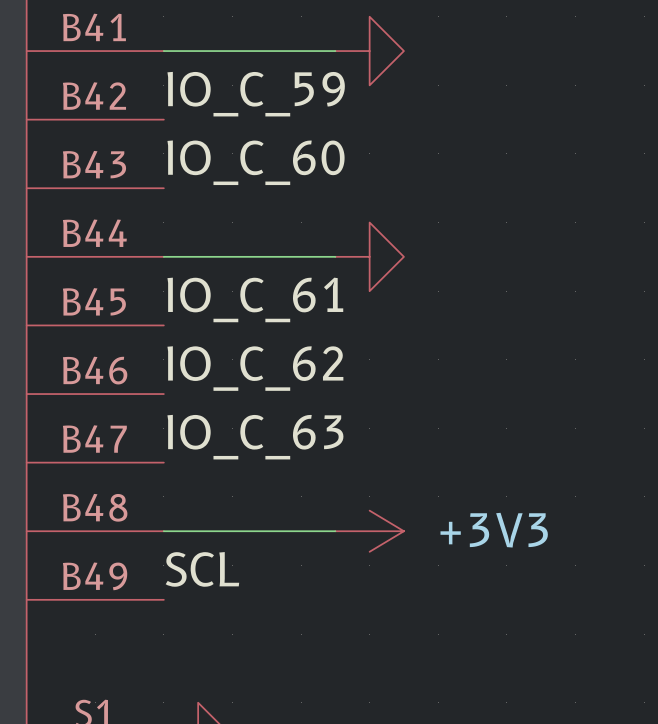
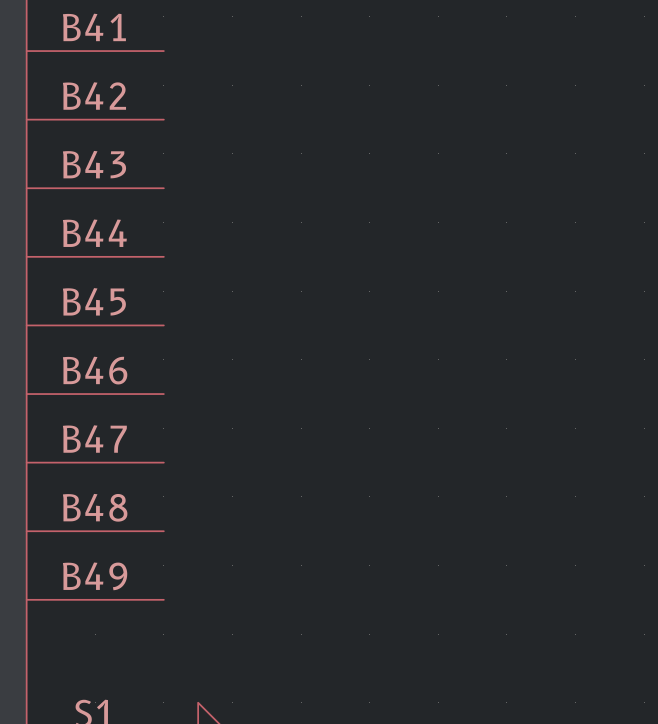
wire: (163, 51) (335, 51) -> none
power symbol: (369, 51) -> none
label: IO_C_59 (256, 94) -> none
label: IO_C_60 (256, 162) -> none
wire: (163, 256) (335, 256) -> none
power symbol: (369, 256) -> none
label: IO_C_61 (255, 299) -> none
label: IO_C_62 (255, 368) -> none
label: IO_C_63 (255, 437) -> none
wire: (163, 531) (335, 531) -> none
power symbol: +3V3 (369, 531) -> none
label: SCL (202, 569) -> none

